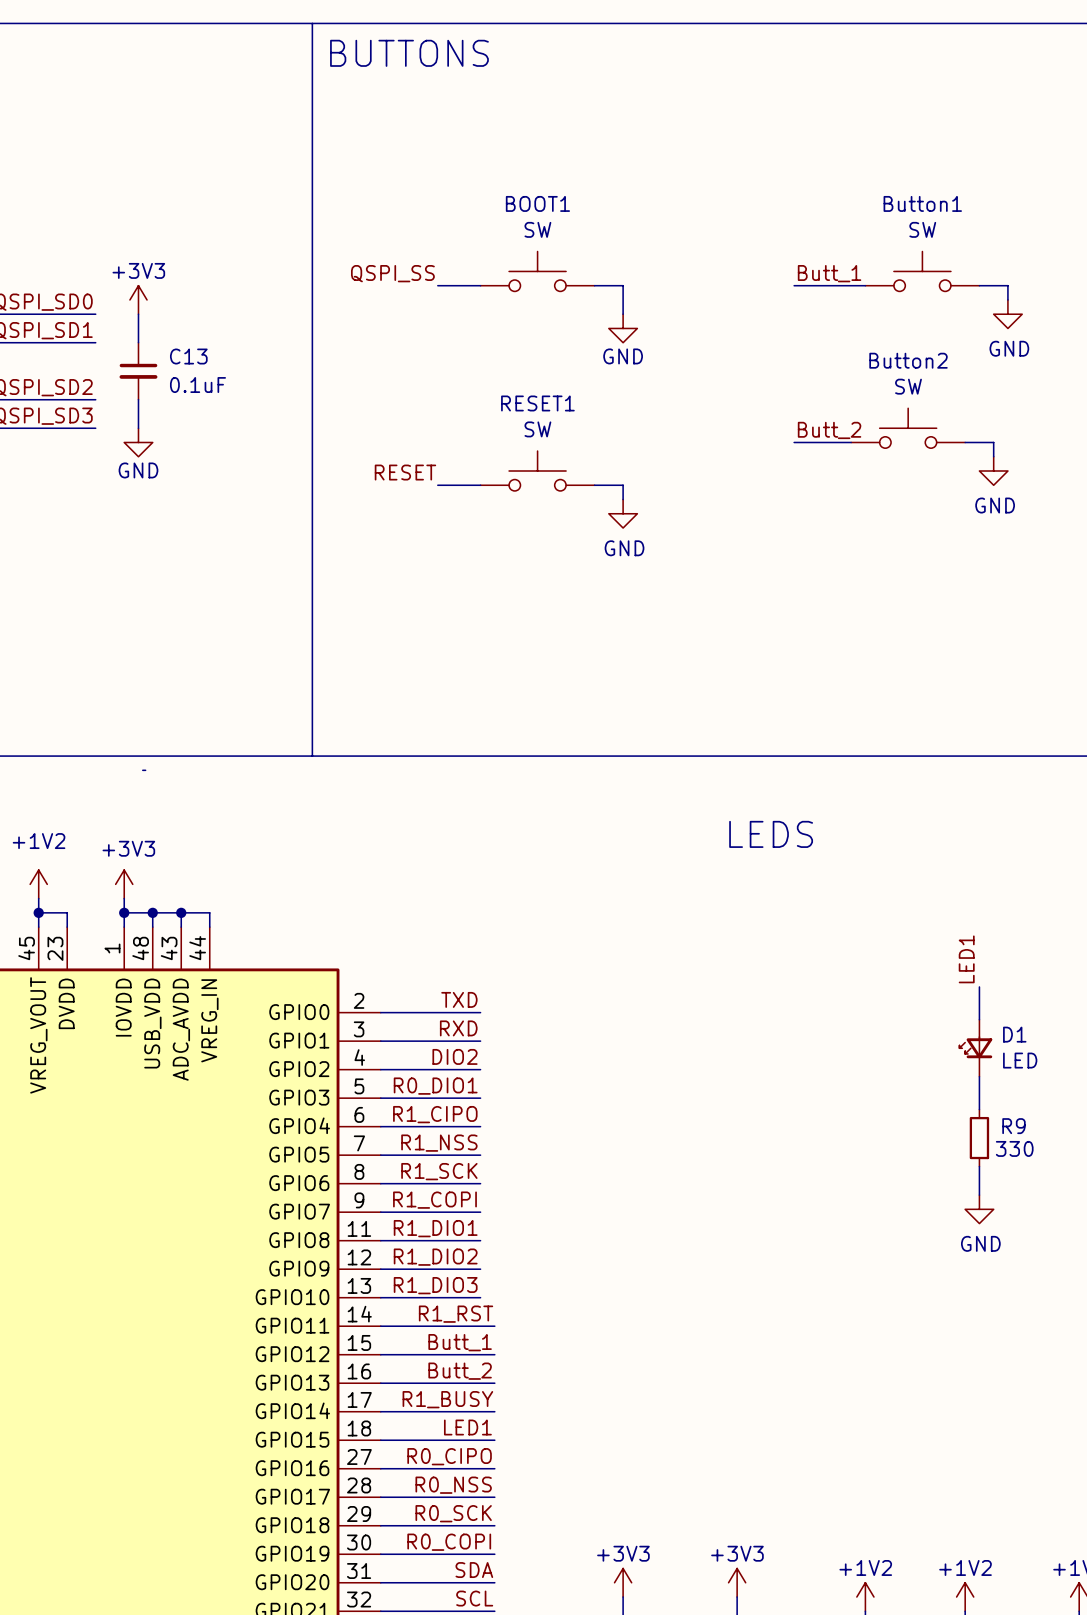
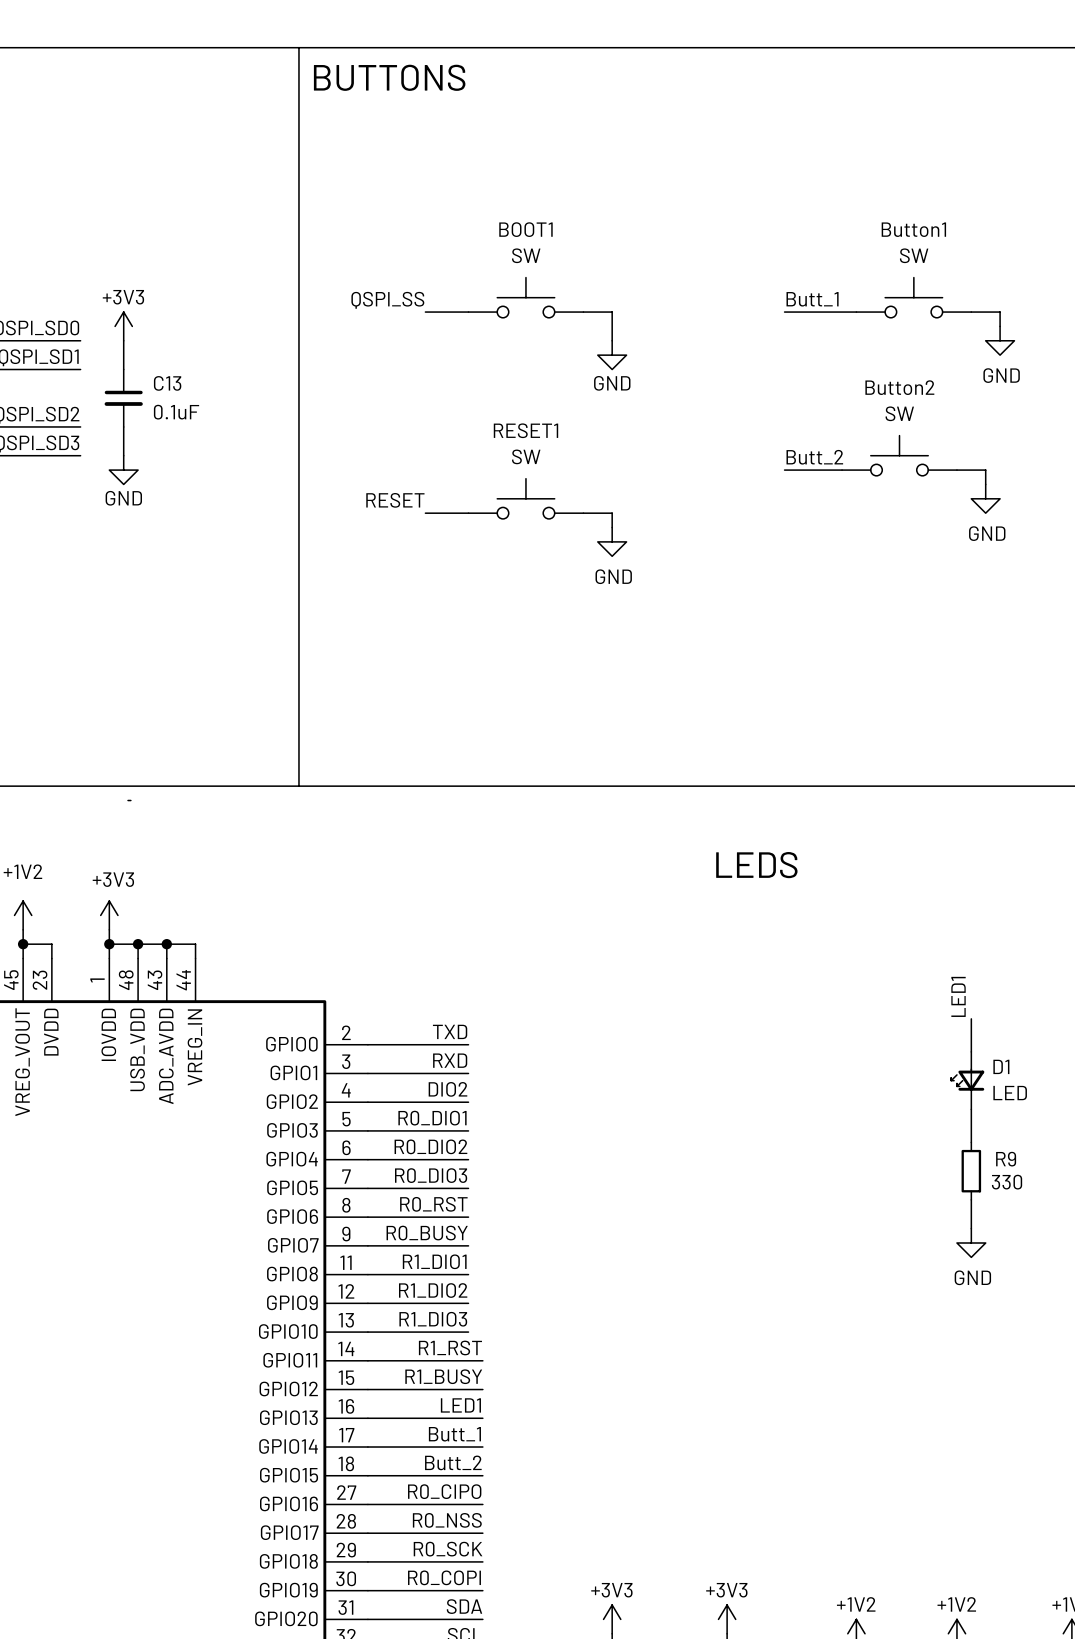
label: R1_CIPO (435, 1114) -> R0_DIO2 (430, 1146)
label: R1_NSS (439, 1143) -> R0_DIO3 (431, 1175)
label: R1_SCK (439, 1171) -> R0_RST (433, 1204)
label: R1_COPI (434, 1200) -> R0_BUSY (427, 1233)
label: Butt_1 (460, 1342) -> R1_BUSY (443, 1376)
label: Butt_2 (460, 1371) -> LED1 (460, 1405)
label: R1_BUSY (447, 1399) -> Butt_1 (454, 1434)
label: LED1 (467, 1427) -> Butt_2 (453, 1462)

